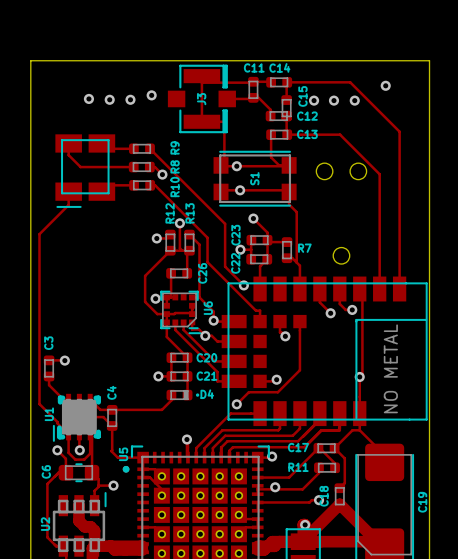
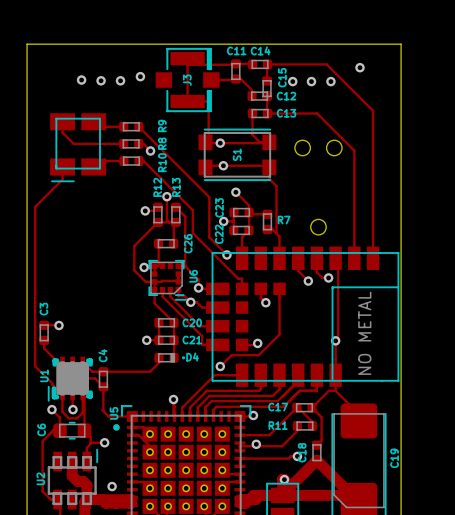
via: none -> (112, 486)

